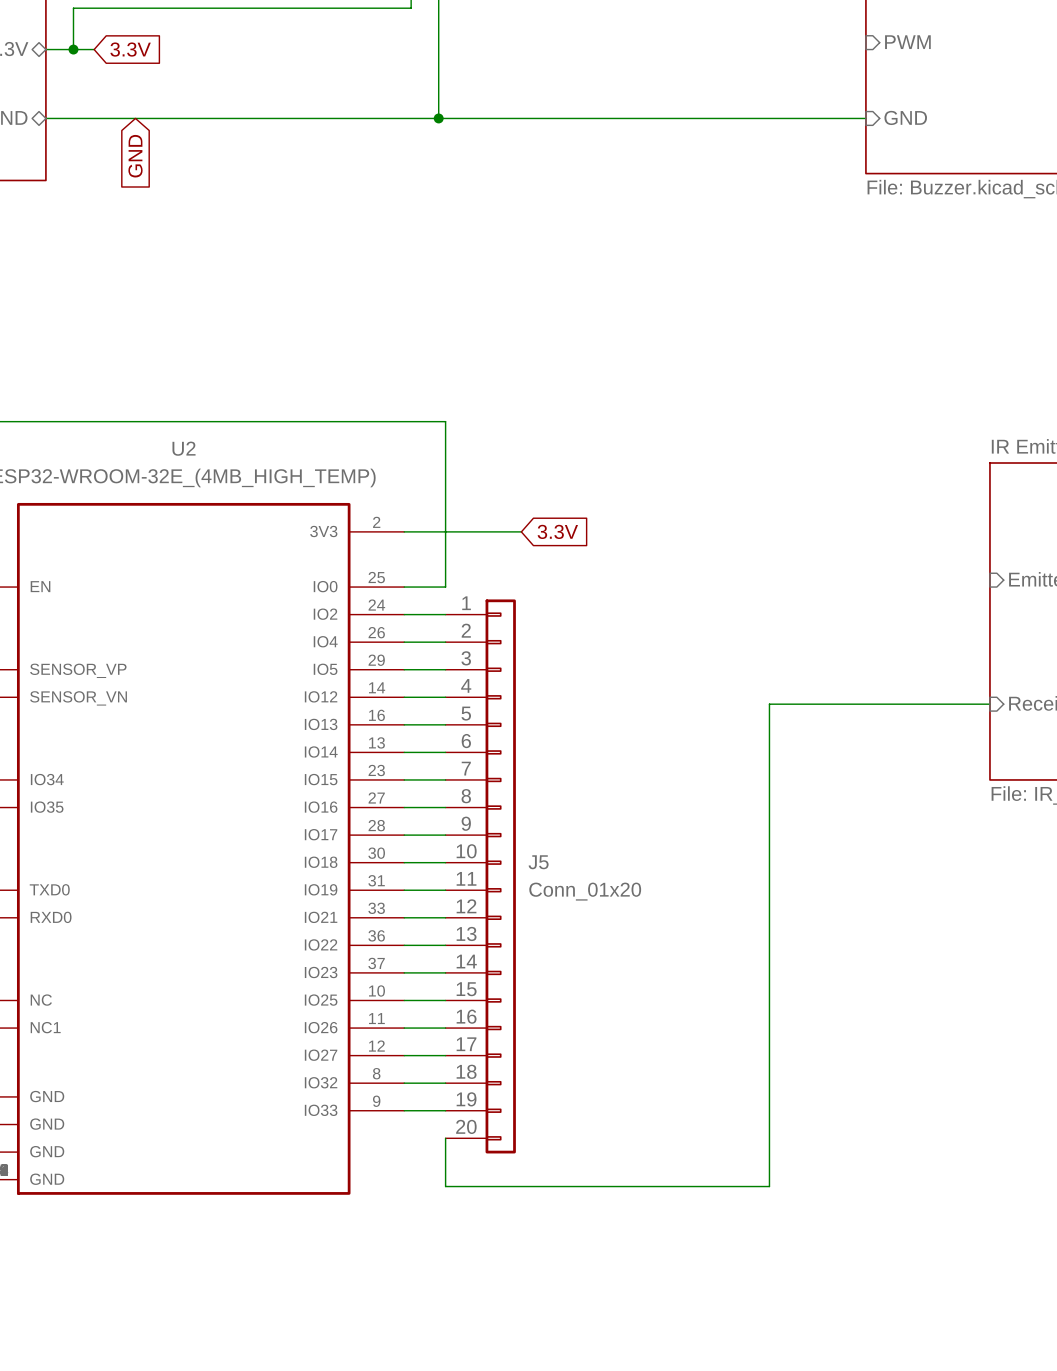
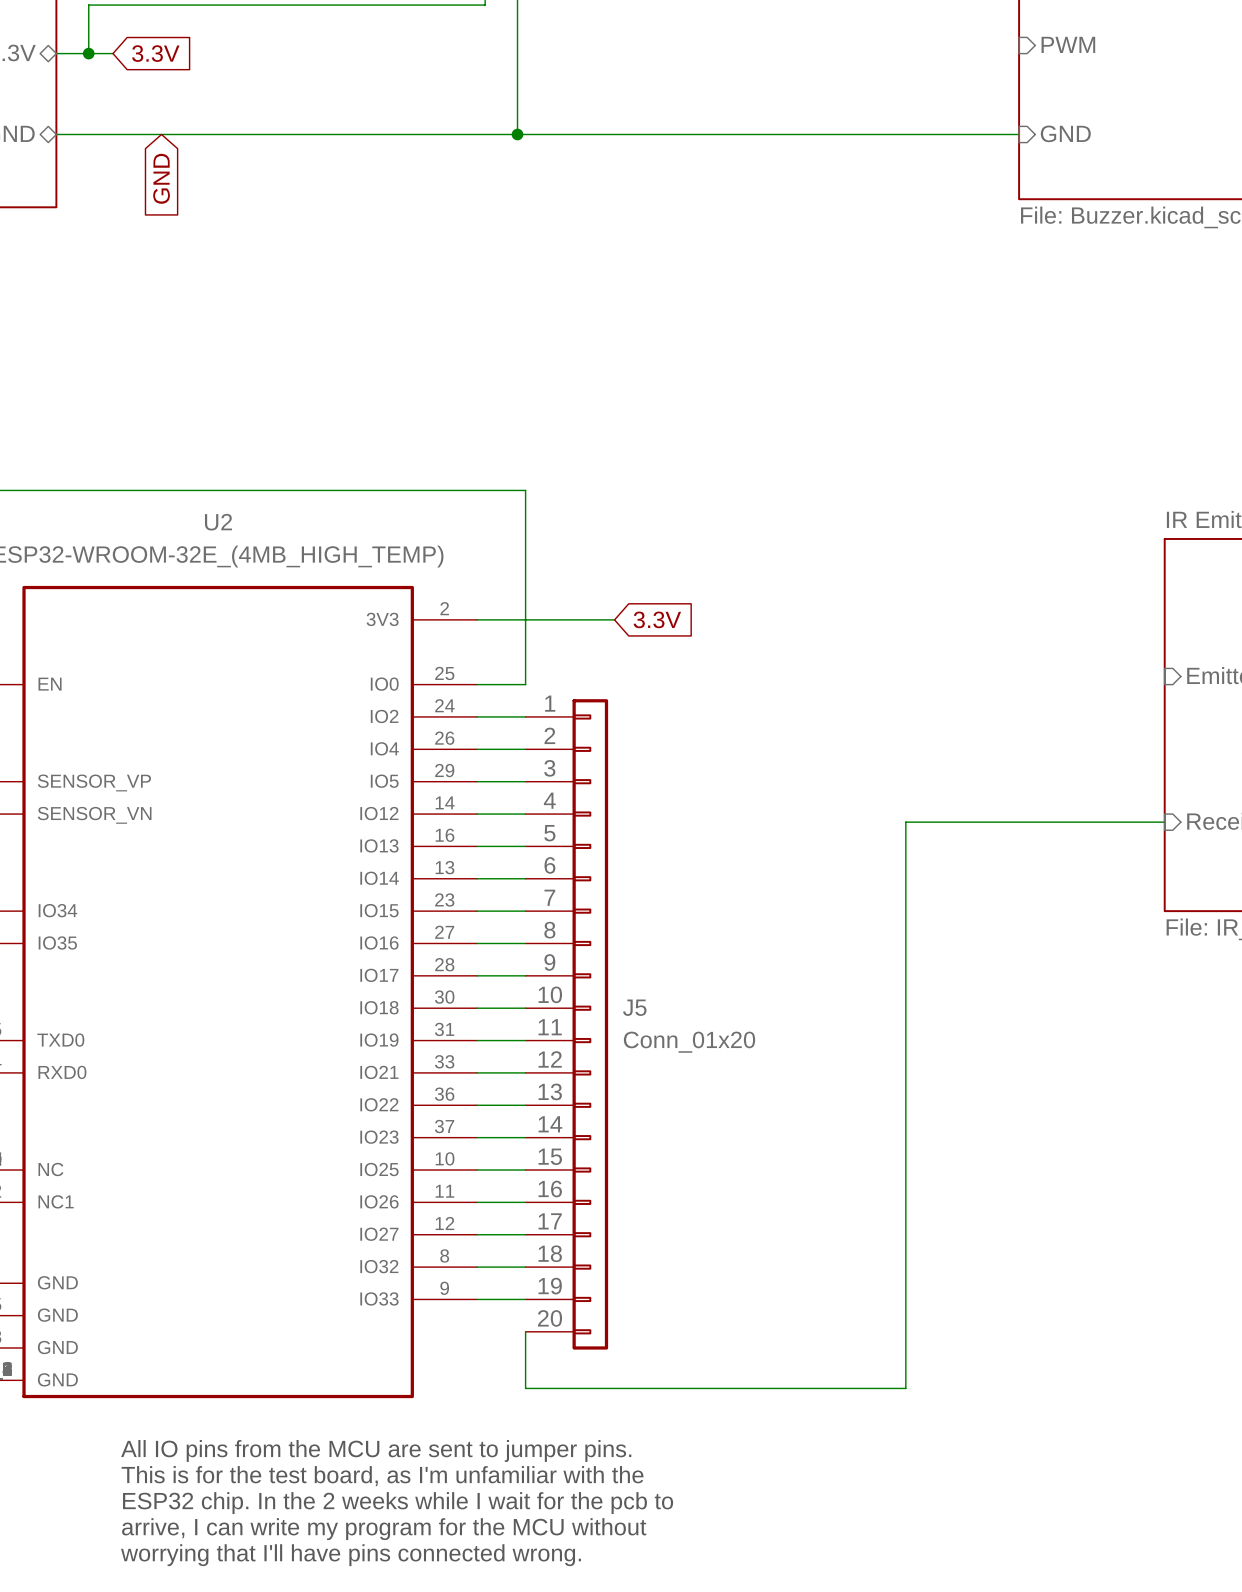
text: none -> All IO pins from the MCU are sent to jumper pins. (376, 1450)
text: none -> This is for the test board, as I'm unfamiliar with the (382, 1476)
text: none -> ESP32 chip. In the 2 weeks while I wait for the pcb to (398, 1503)
text: none -> arrive, I can write my program for the MCU without (384, 1529)
text: none -> worrying that I'll have pins connected wrong. (351, 1555)

